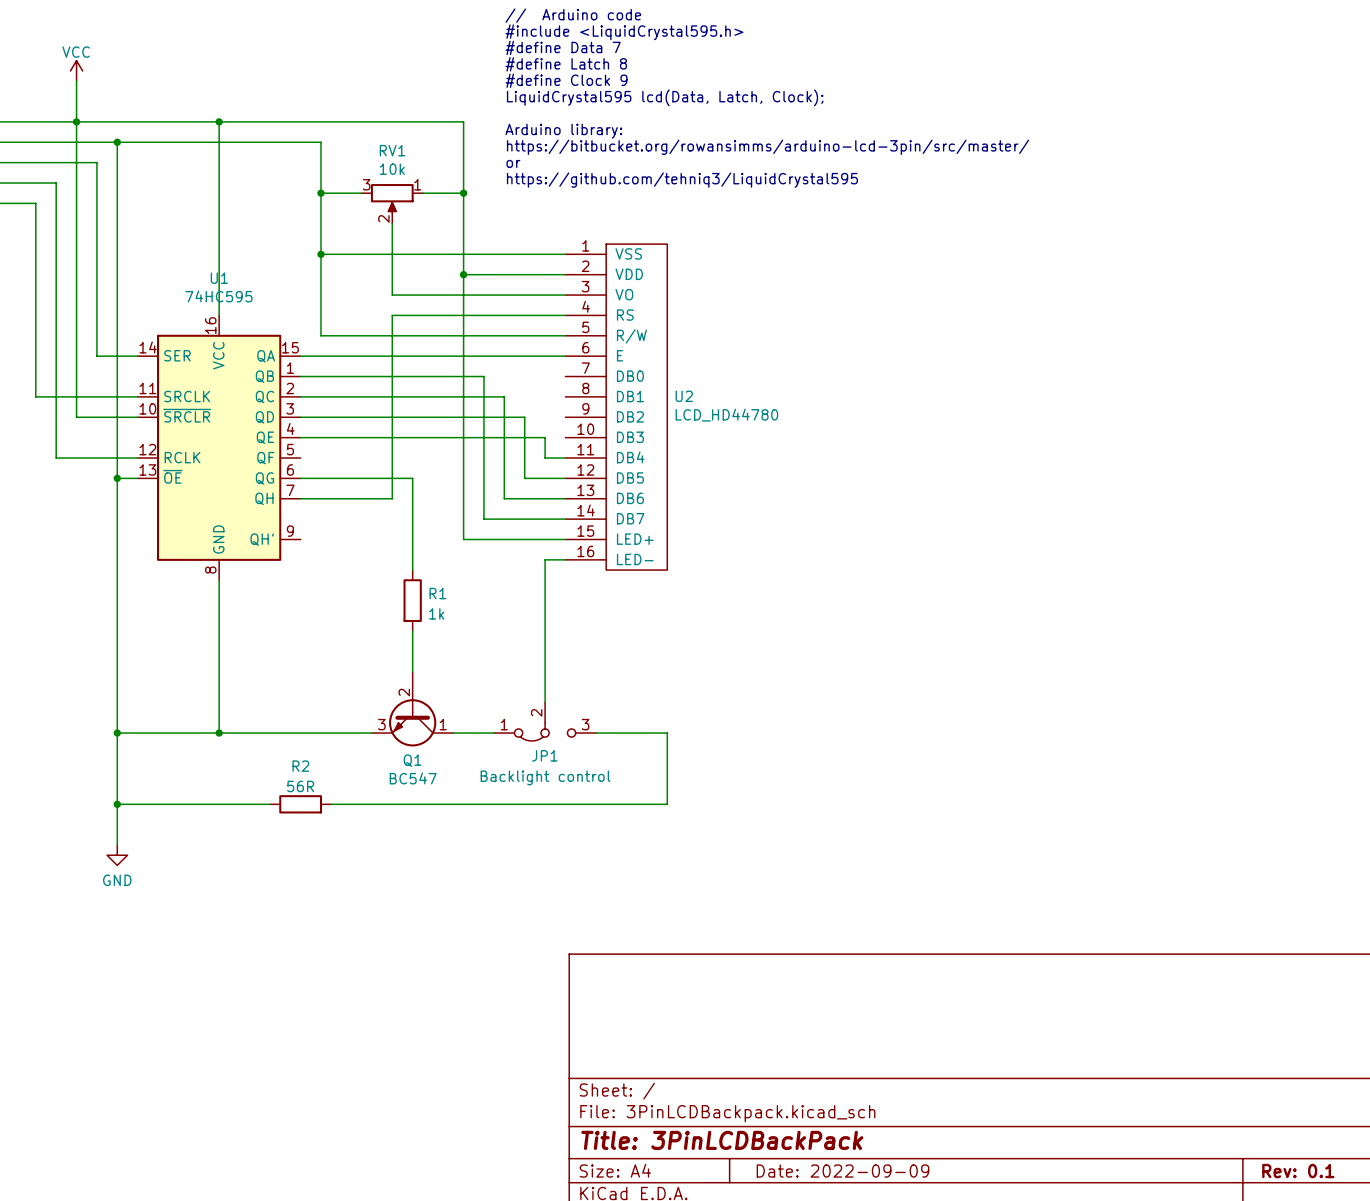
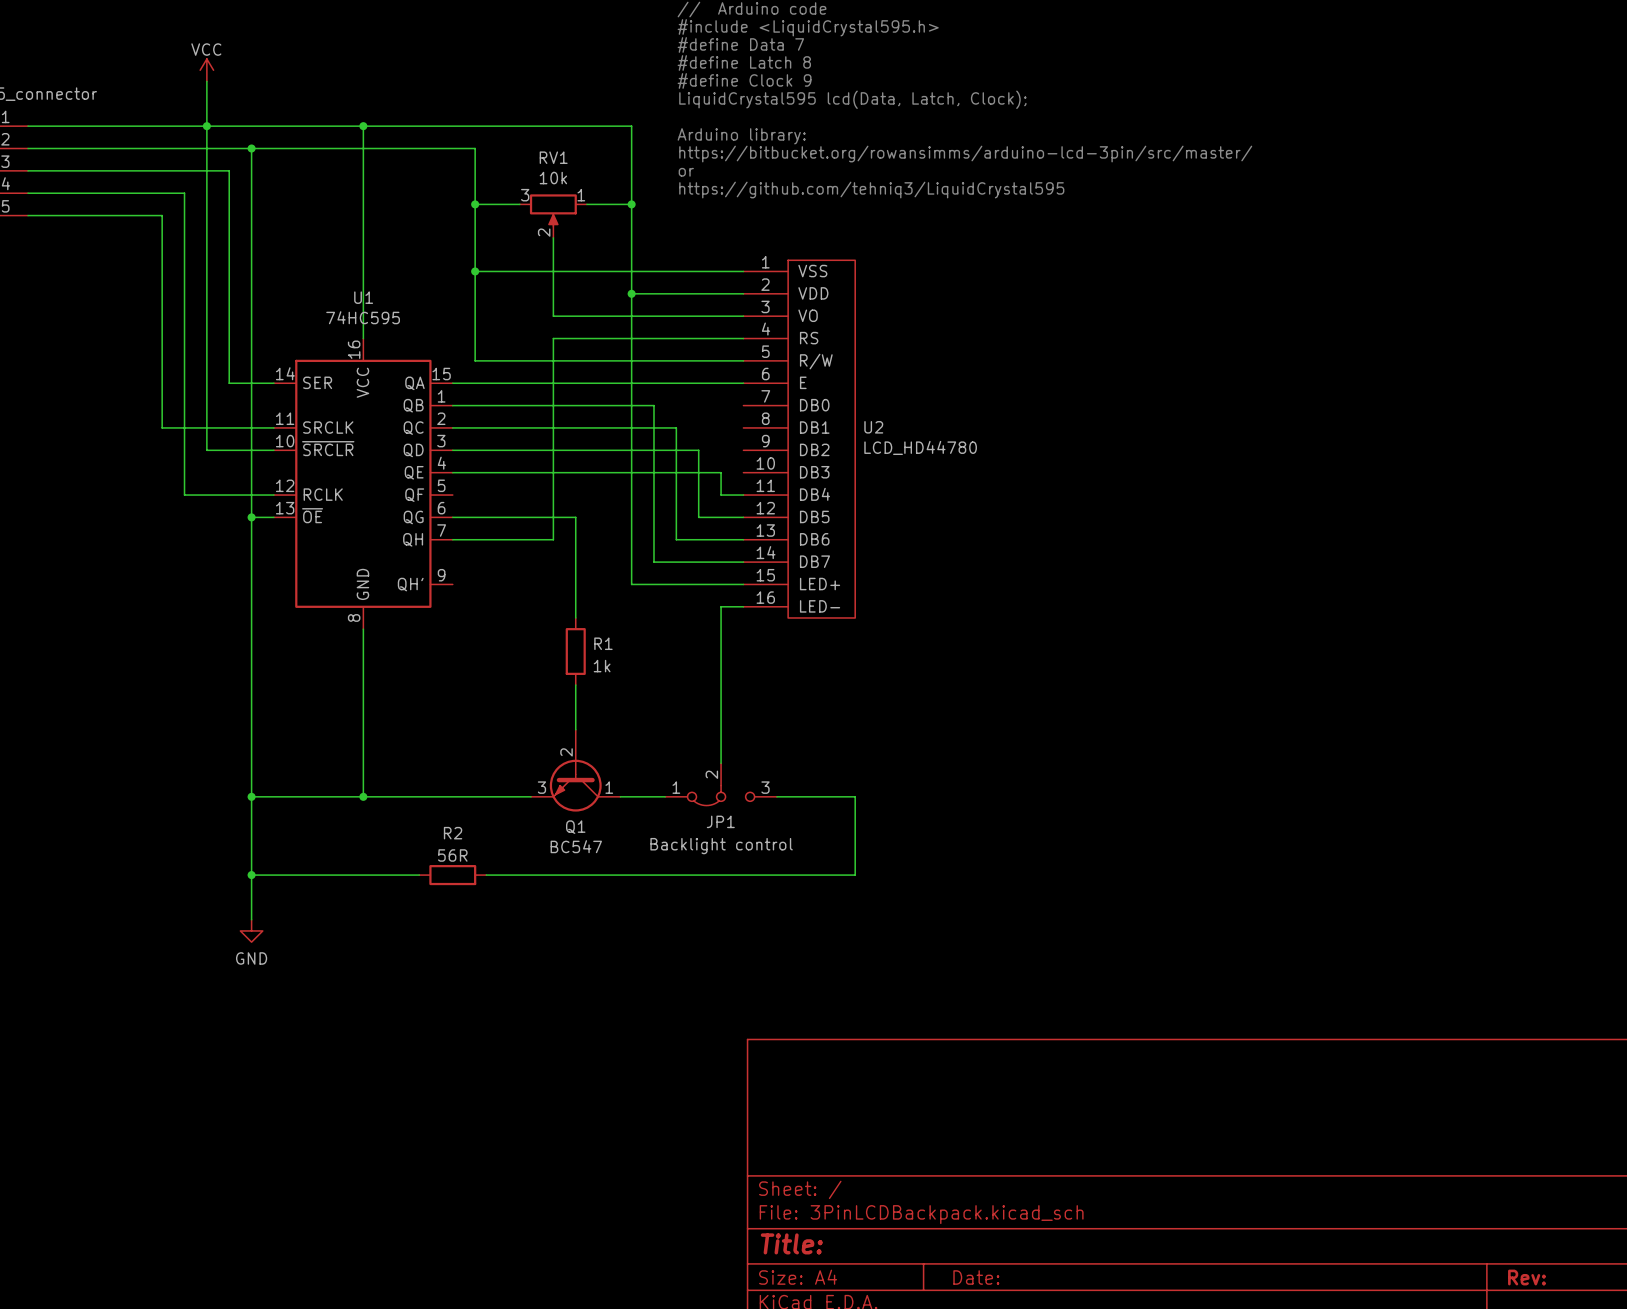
title block: Title: 3PinLCDBackPack (722, 1140) -> Title: (791, 1243)
title block: Date: 2022-09-09 (842, 1171) -> Date: (976, 1277)
title block: Rev: 0.1 (1298, 1171) -> Rev: (1526, 1277)

